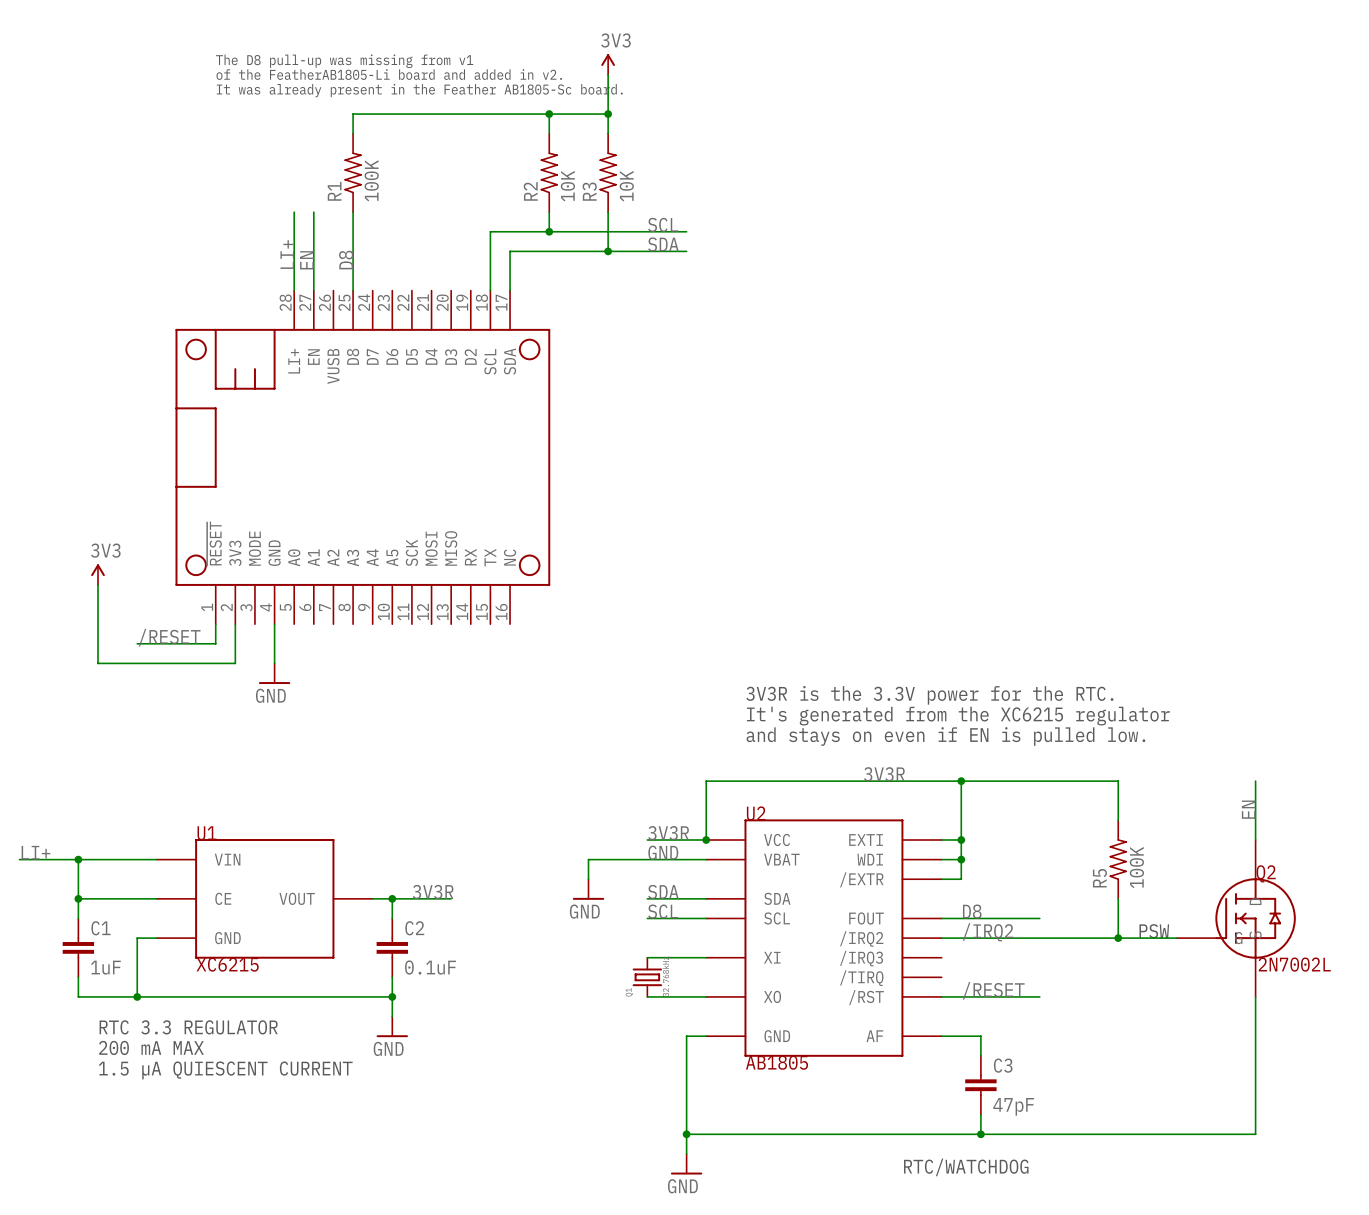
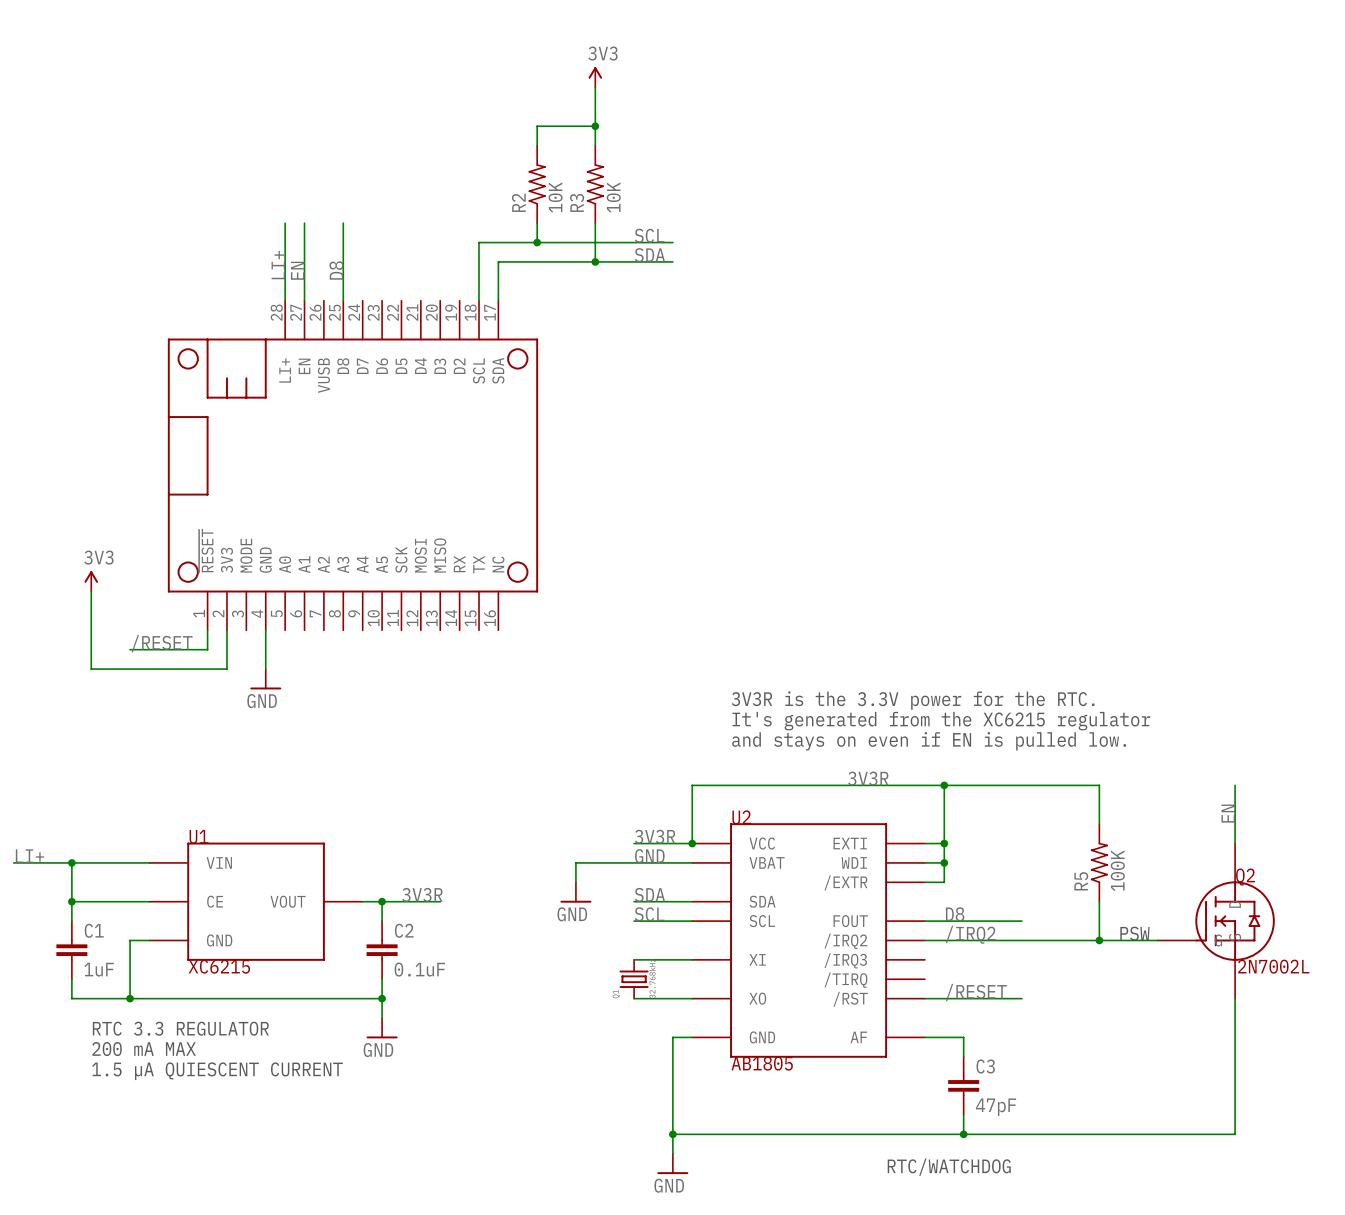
text: The D8 pull-up was missing from v1 (344, 61) -> none
text: of the FeatherAB1805-Li board and added in v2. (389, 74) -> none
text: It was already present in the Feather AB1805-Sc board. (419, 90) -> none
wire: (549, 114) (353, 114) (353, 133) -> none
junction: (549, 114) -> none
R1: 100K (353, 172) -> none

